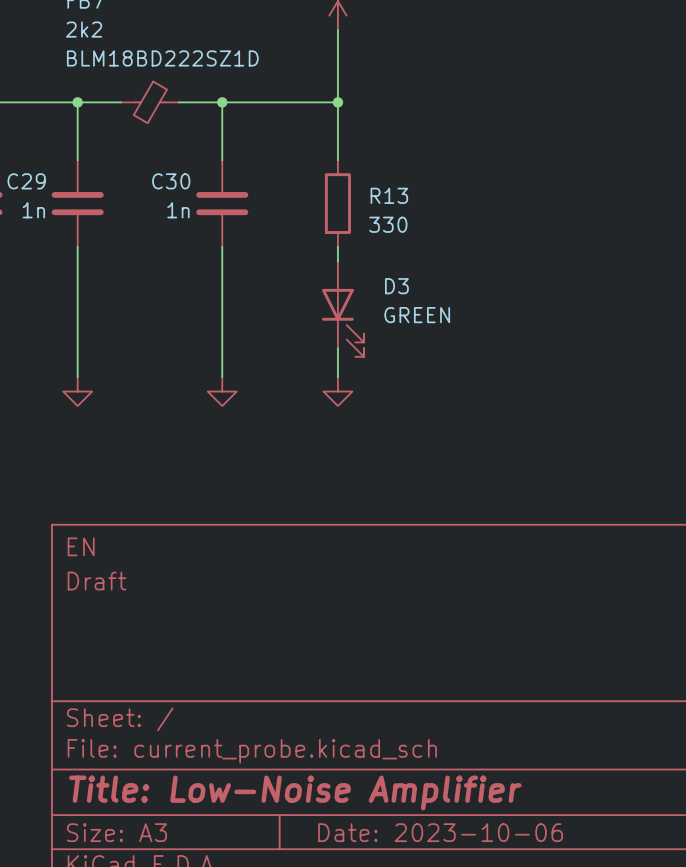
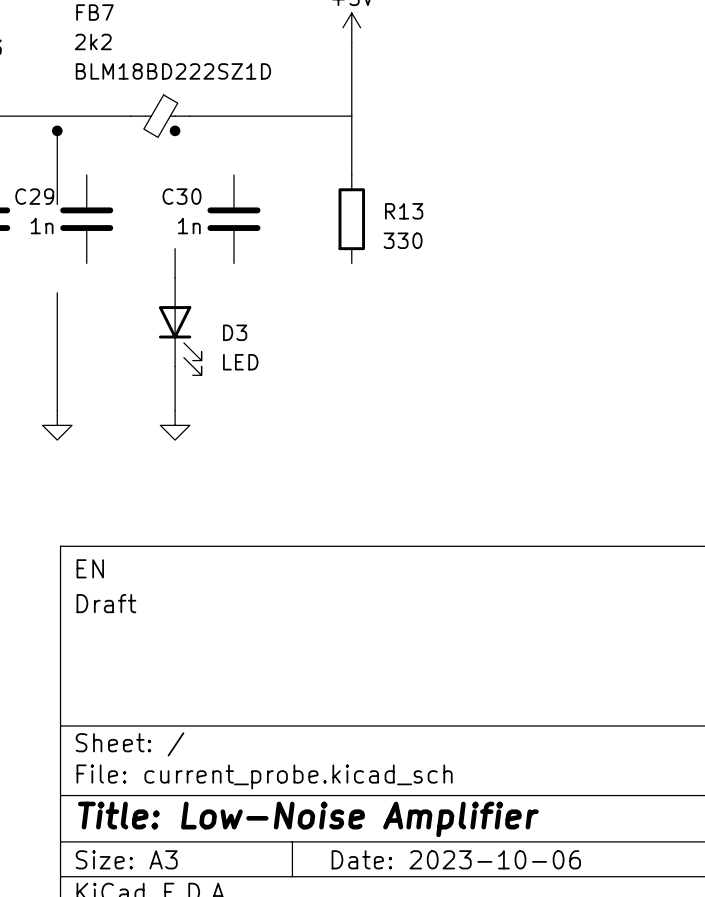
wire: (77, 102) (77, 160) -> none
junction position: (77, 102) -> (57, 130)
wire: (222, 102) (222, 160) -> none
junction: (222, 102) -> none
junction: (337, 102) -> none
wire: none -> (57, 130) (57, 204)
junction: none -> (175, 130)
wire: (77, 246) (77, 377) -> none
wire: (222, 246) (222, 377) -> none
wire: (337, 246) (337, 261) -> none
wire: none -> (57, 292) (57, 410)
D3 name position: D3 (396, 286) -> D3 (235, 332)
D3 position: (343, 309) -> (180, 326)
D3 value: GREEN (417, 315) -> LED (240, 362)
wire: none -> (175, 366) (175, 410)
wire: (337, 348) (337, 377) -> (175, 248) (175, 278)
power symbol position: (77, 391) -> (57, 425)
power symbol: (222, 391) -> none
power symbol: (337, 391) -> none
power symbol: none -> (175, 425)

